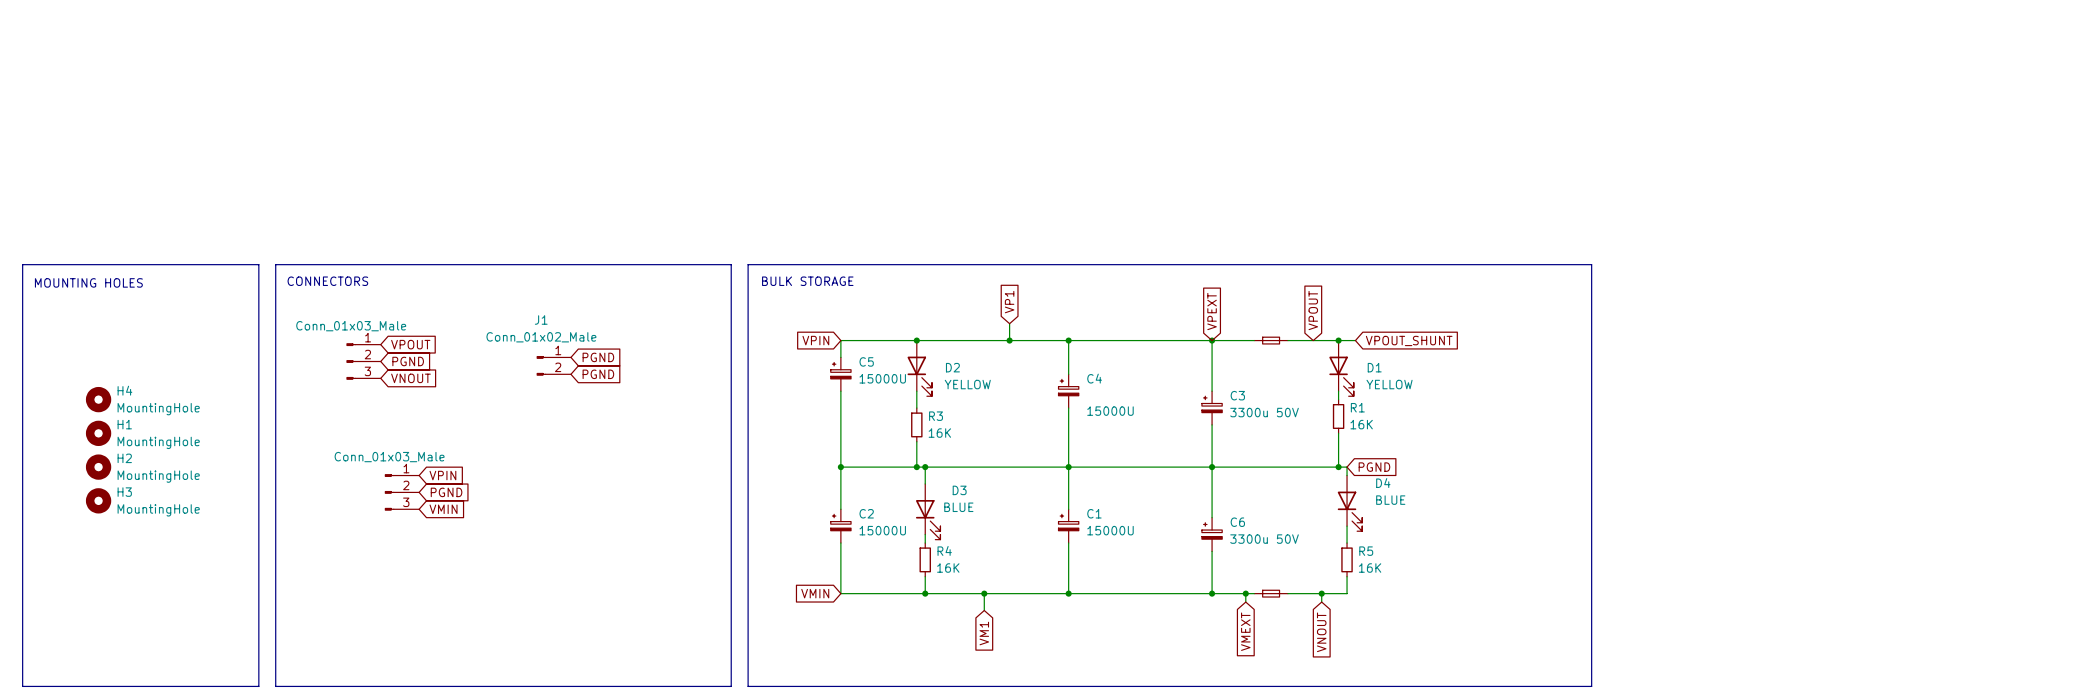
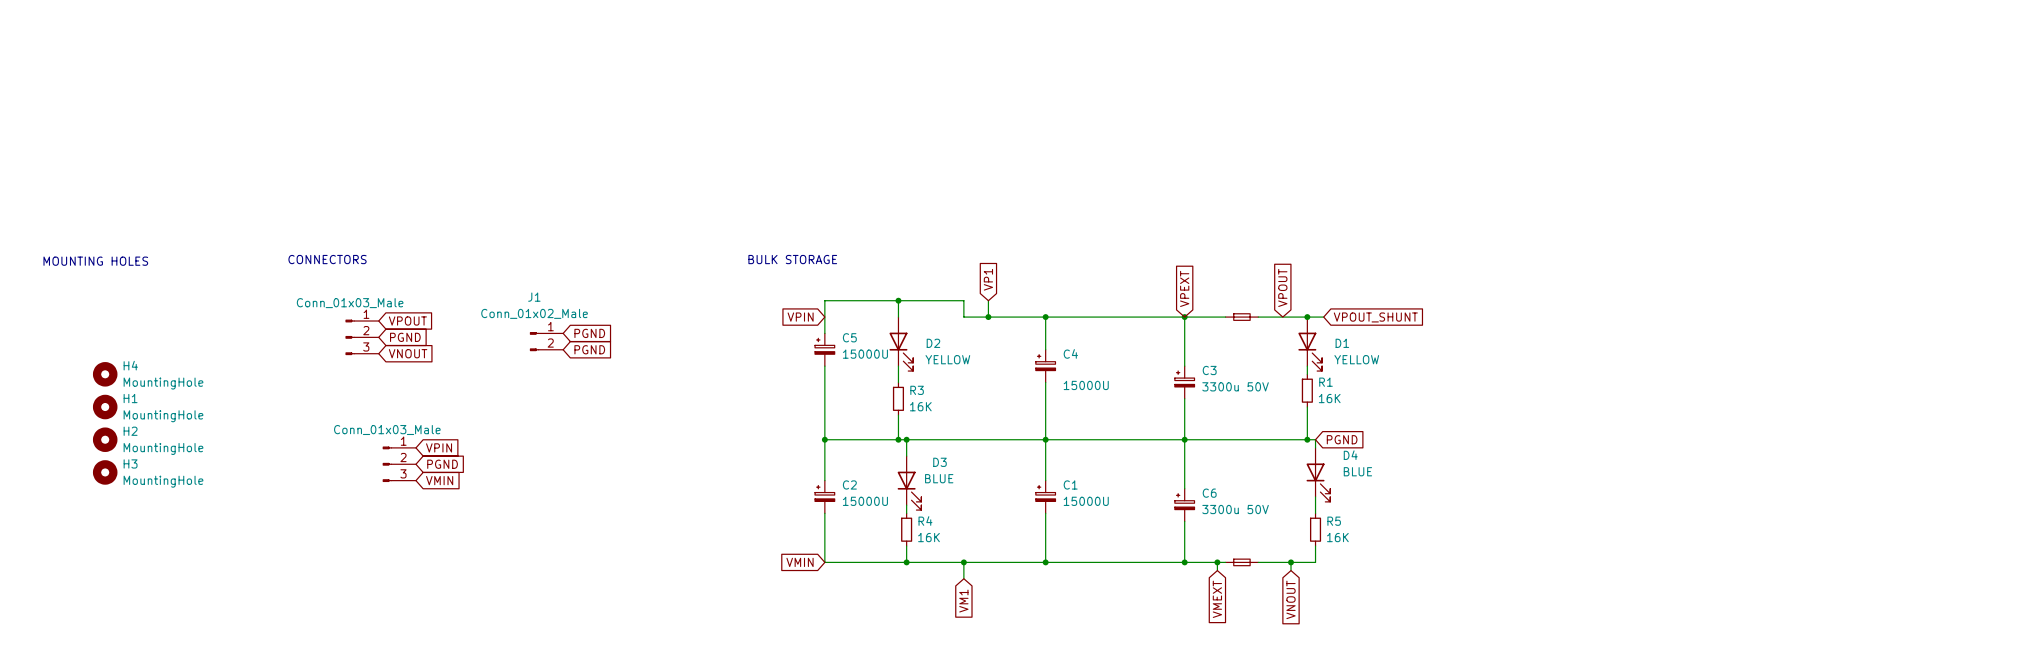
line: (22, 264) (258, 264) (258, 686) (22, 686) (22, 264) -> none
line: (275, 264) (731, 264) (731, 686) (275, 686) (275, 264) -> none
line: (748, 264) (1591, 264) (1591, 686) (748, 686) (748, 264) -> none
wire: none -> (898, 300) (898, 317)
wire: (840, 340) (984, 340) -> (824, 317) (824, 300) (963, 300) (963, 317)
junction position: (916, 340) -> (898, 300)

